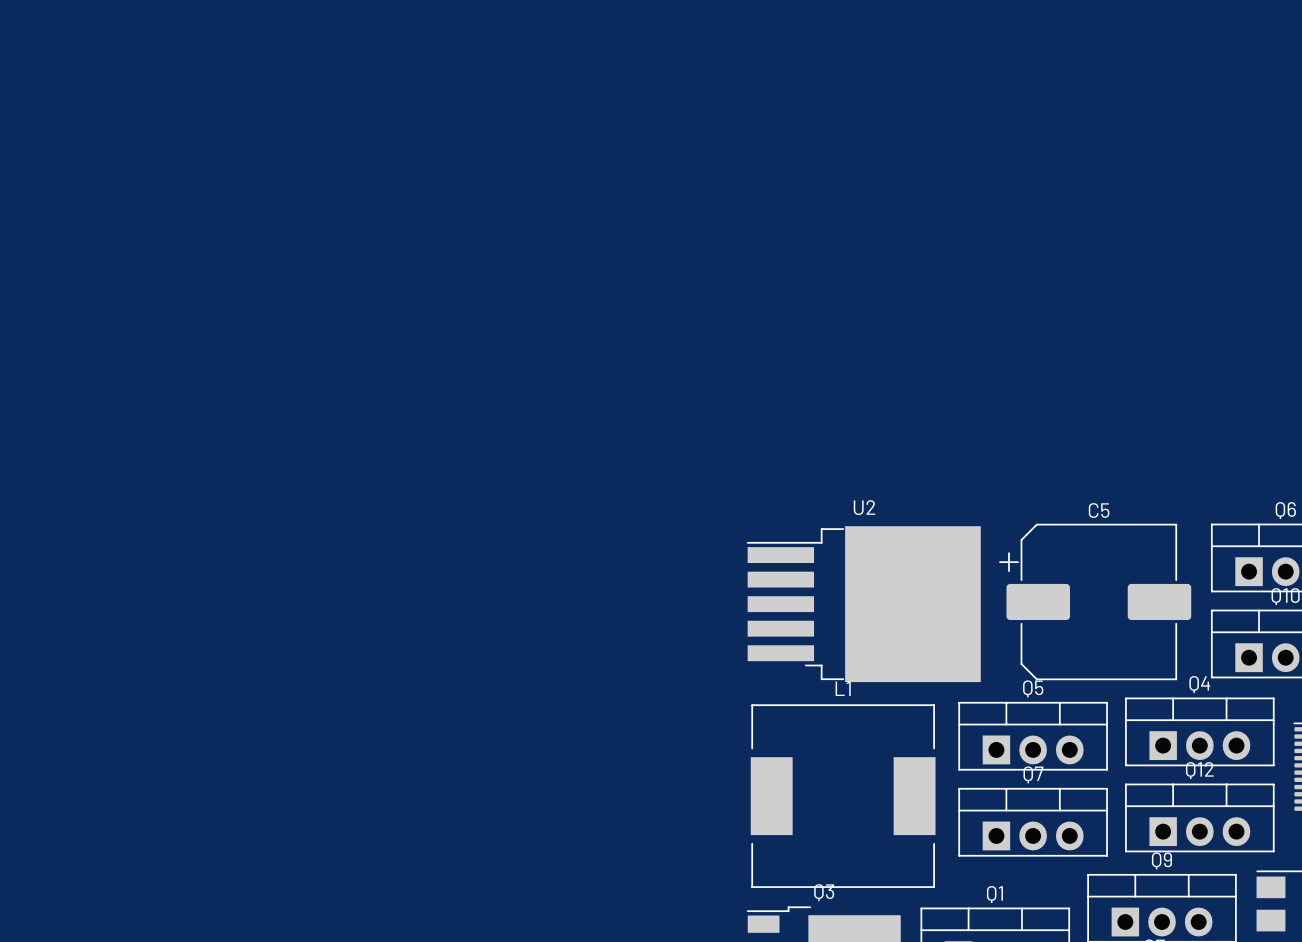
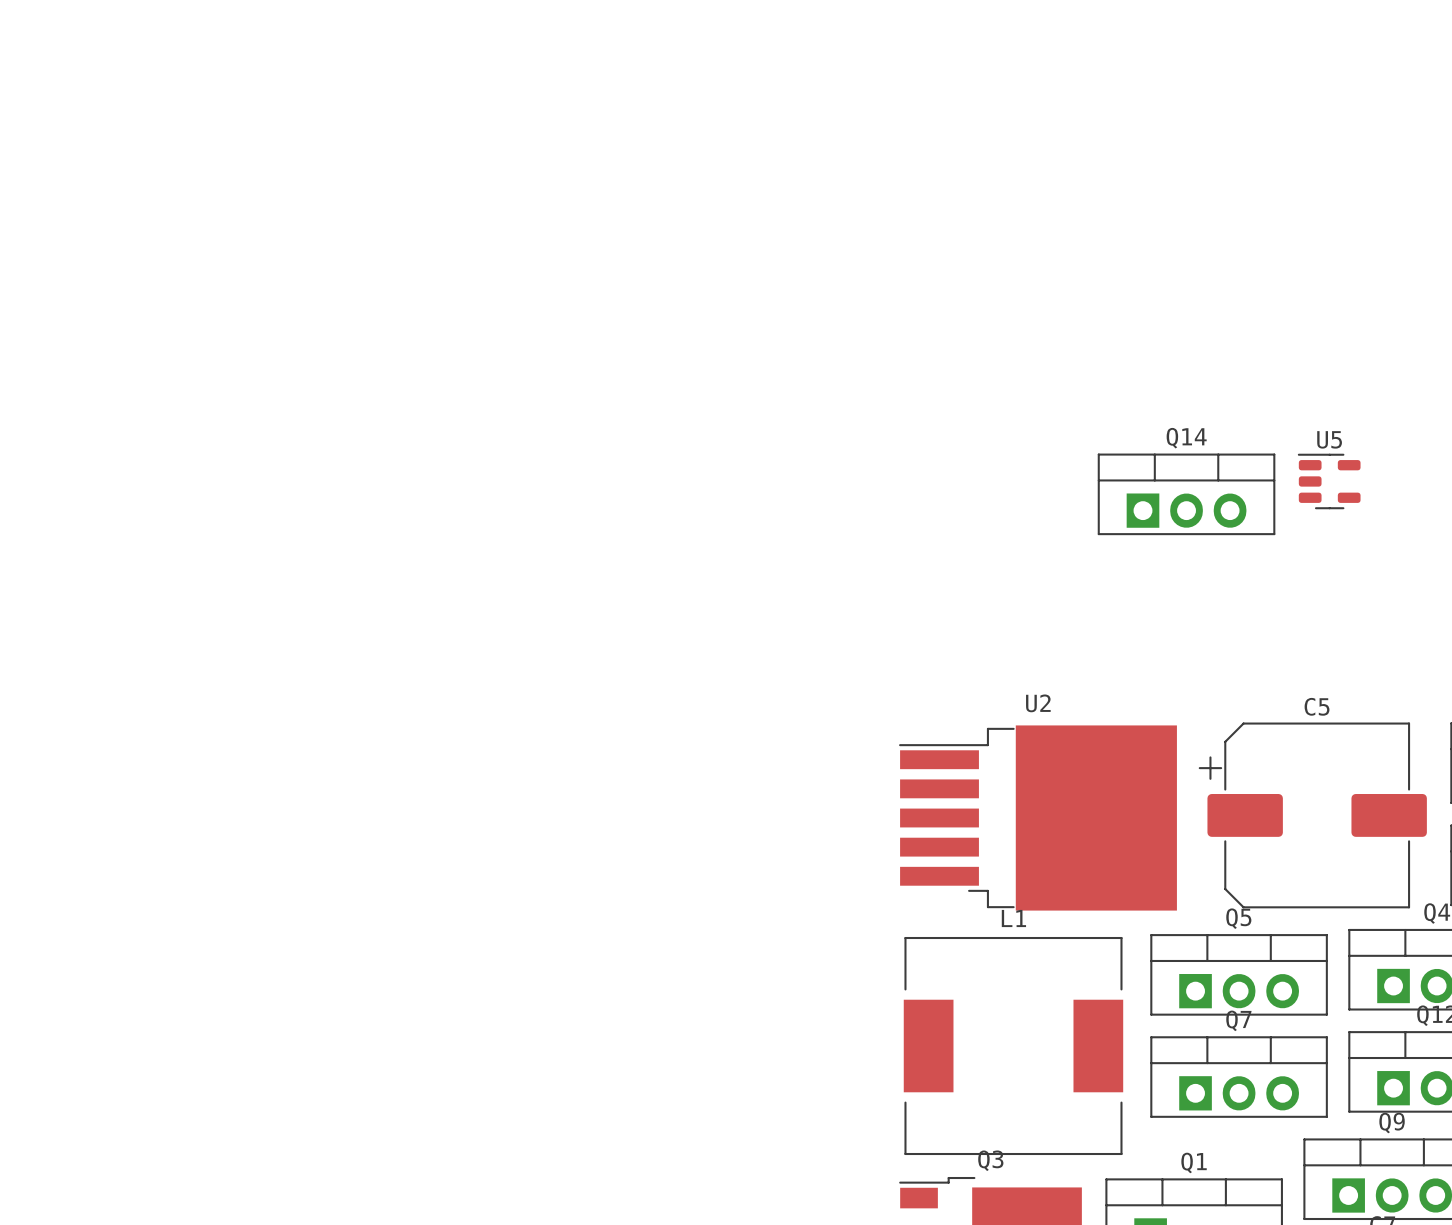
U5: none -> (1329, 481)
Q14: none -> (1186, 494)

